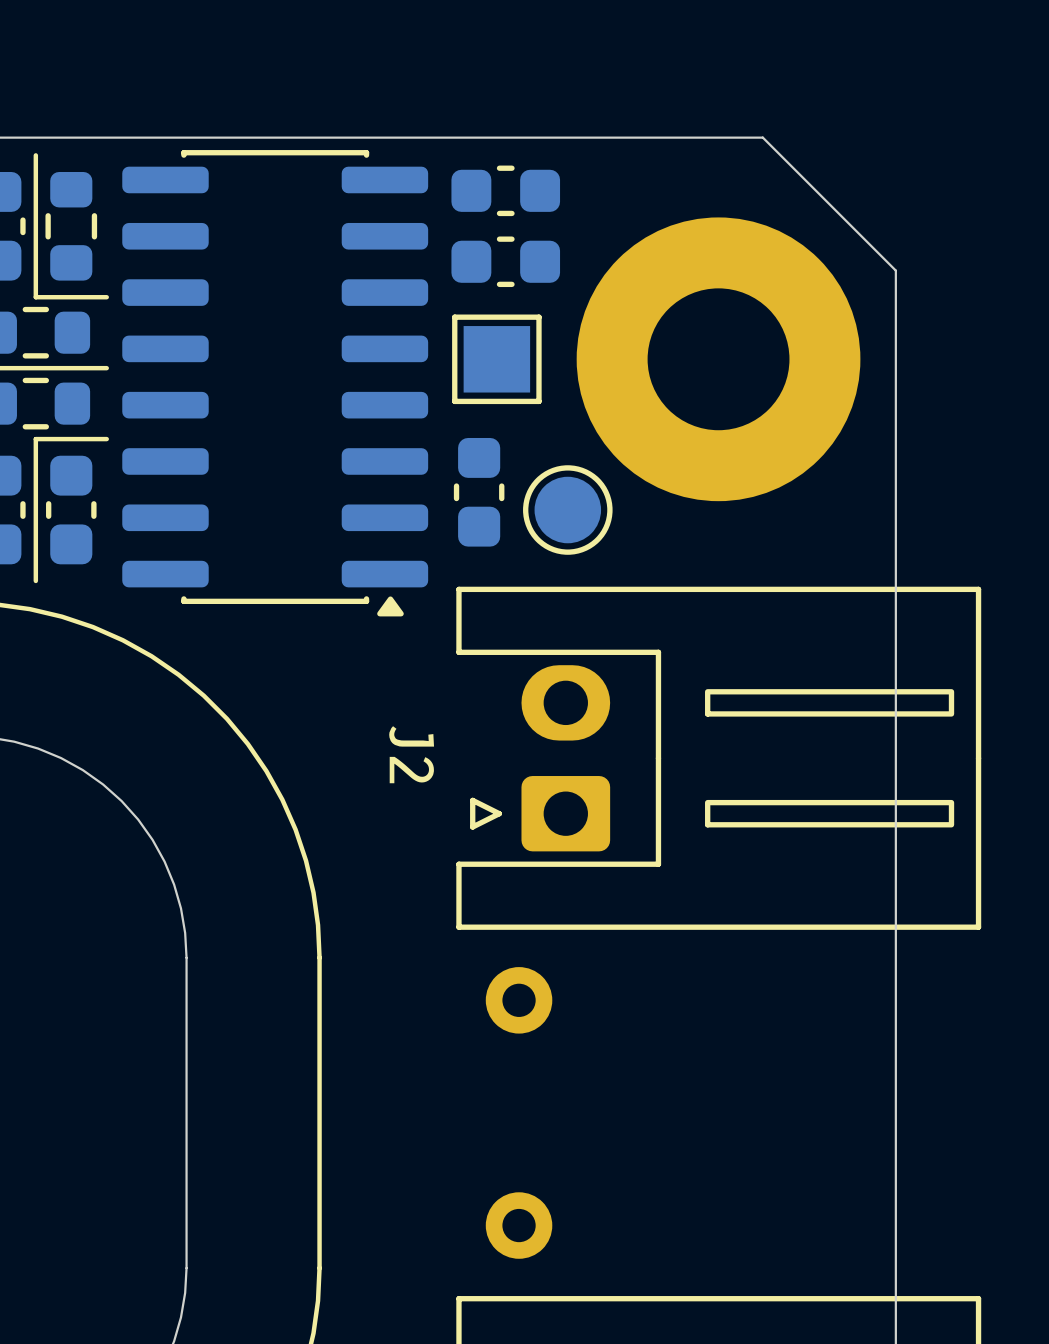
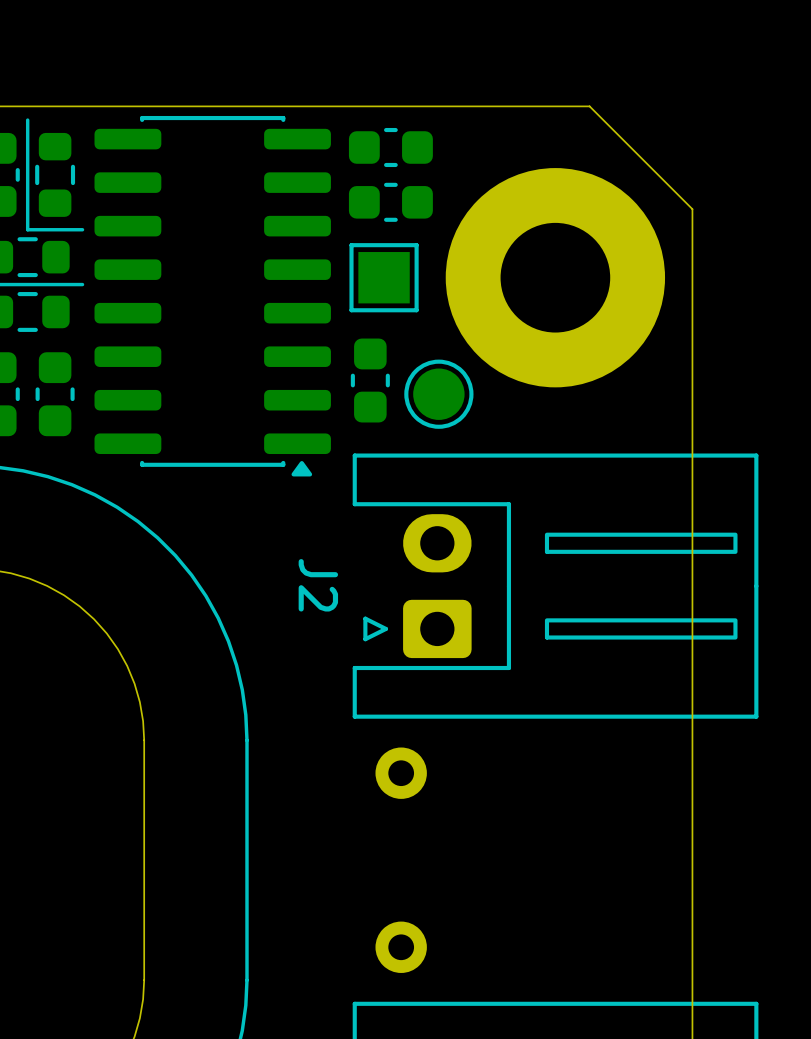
line: (106, 439) (35, 439) (35, 580) -> none

